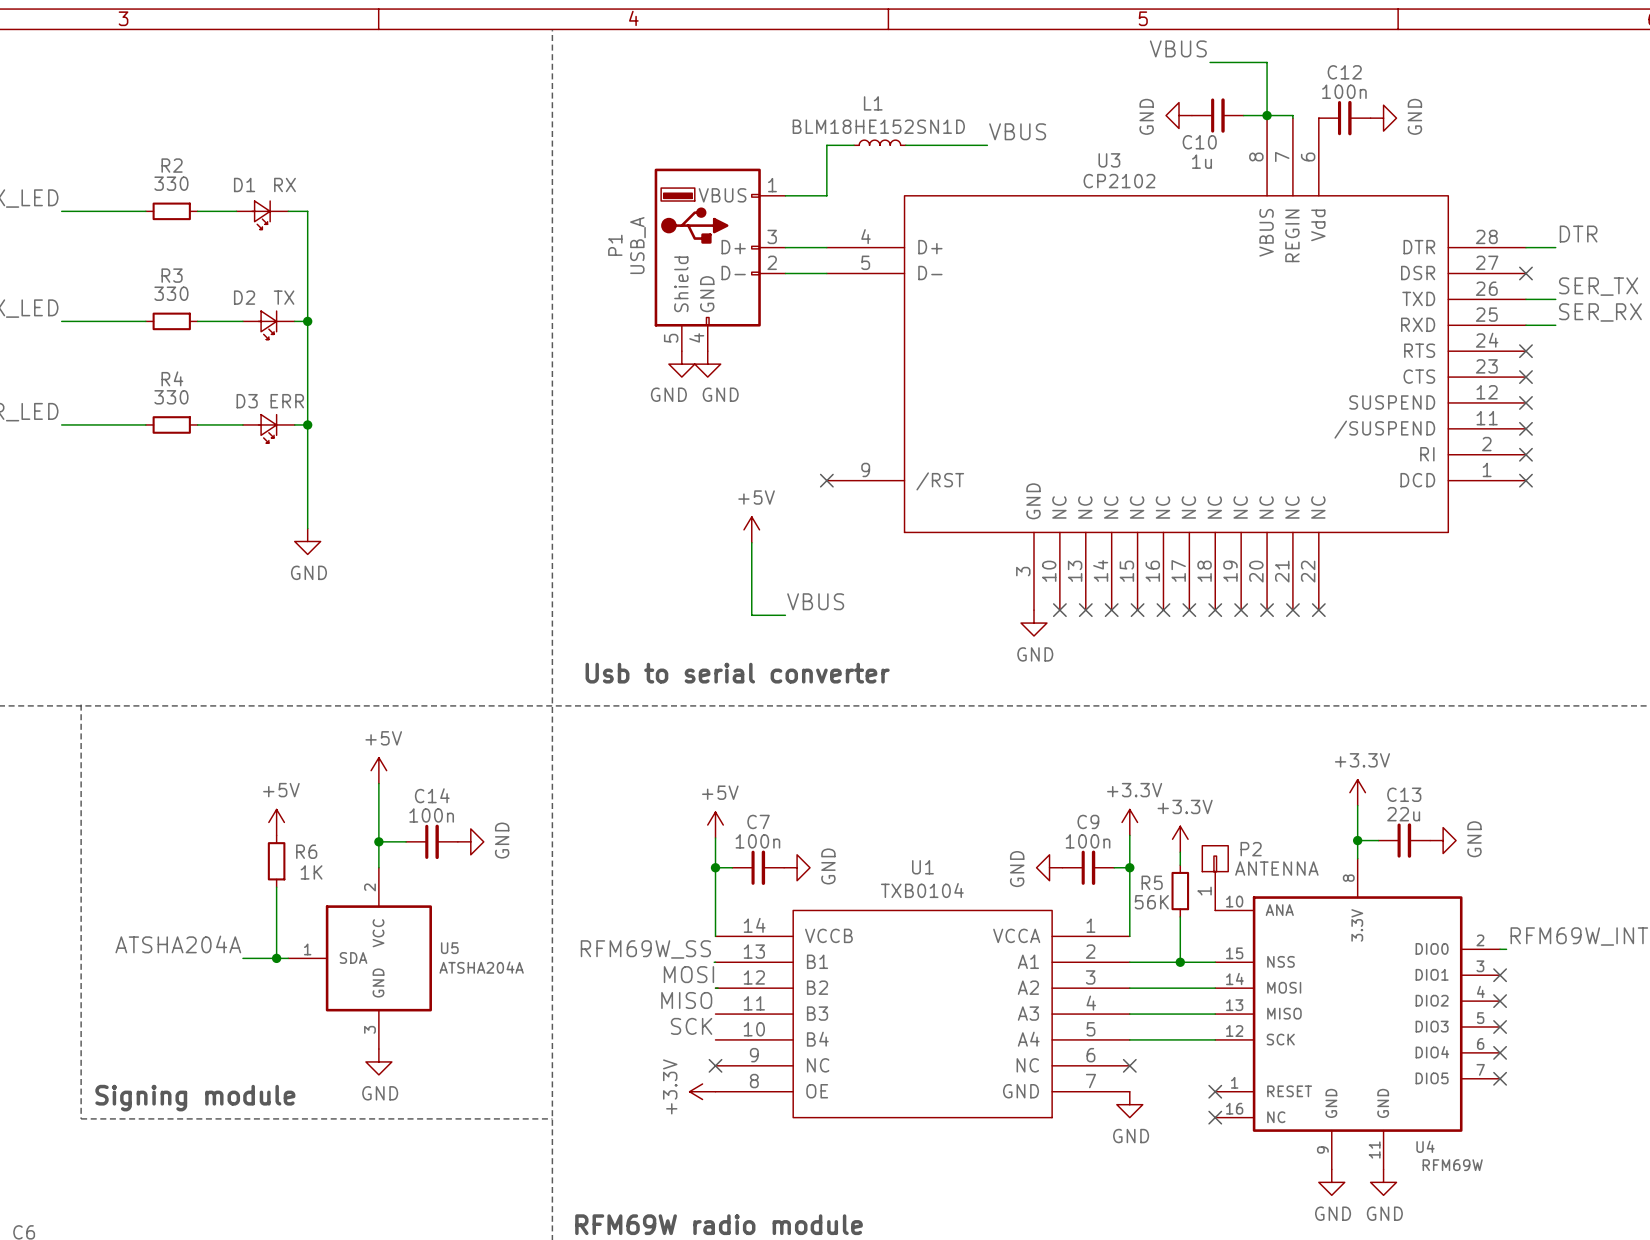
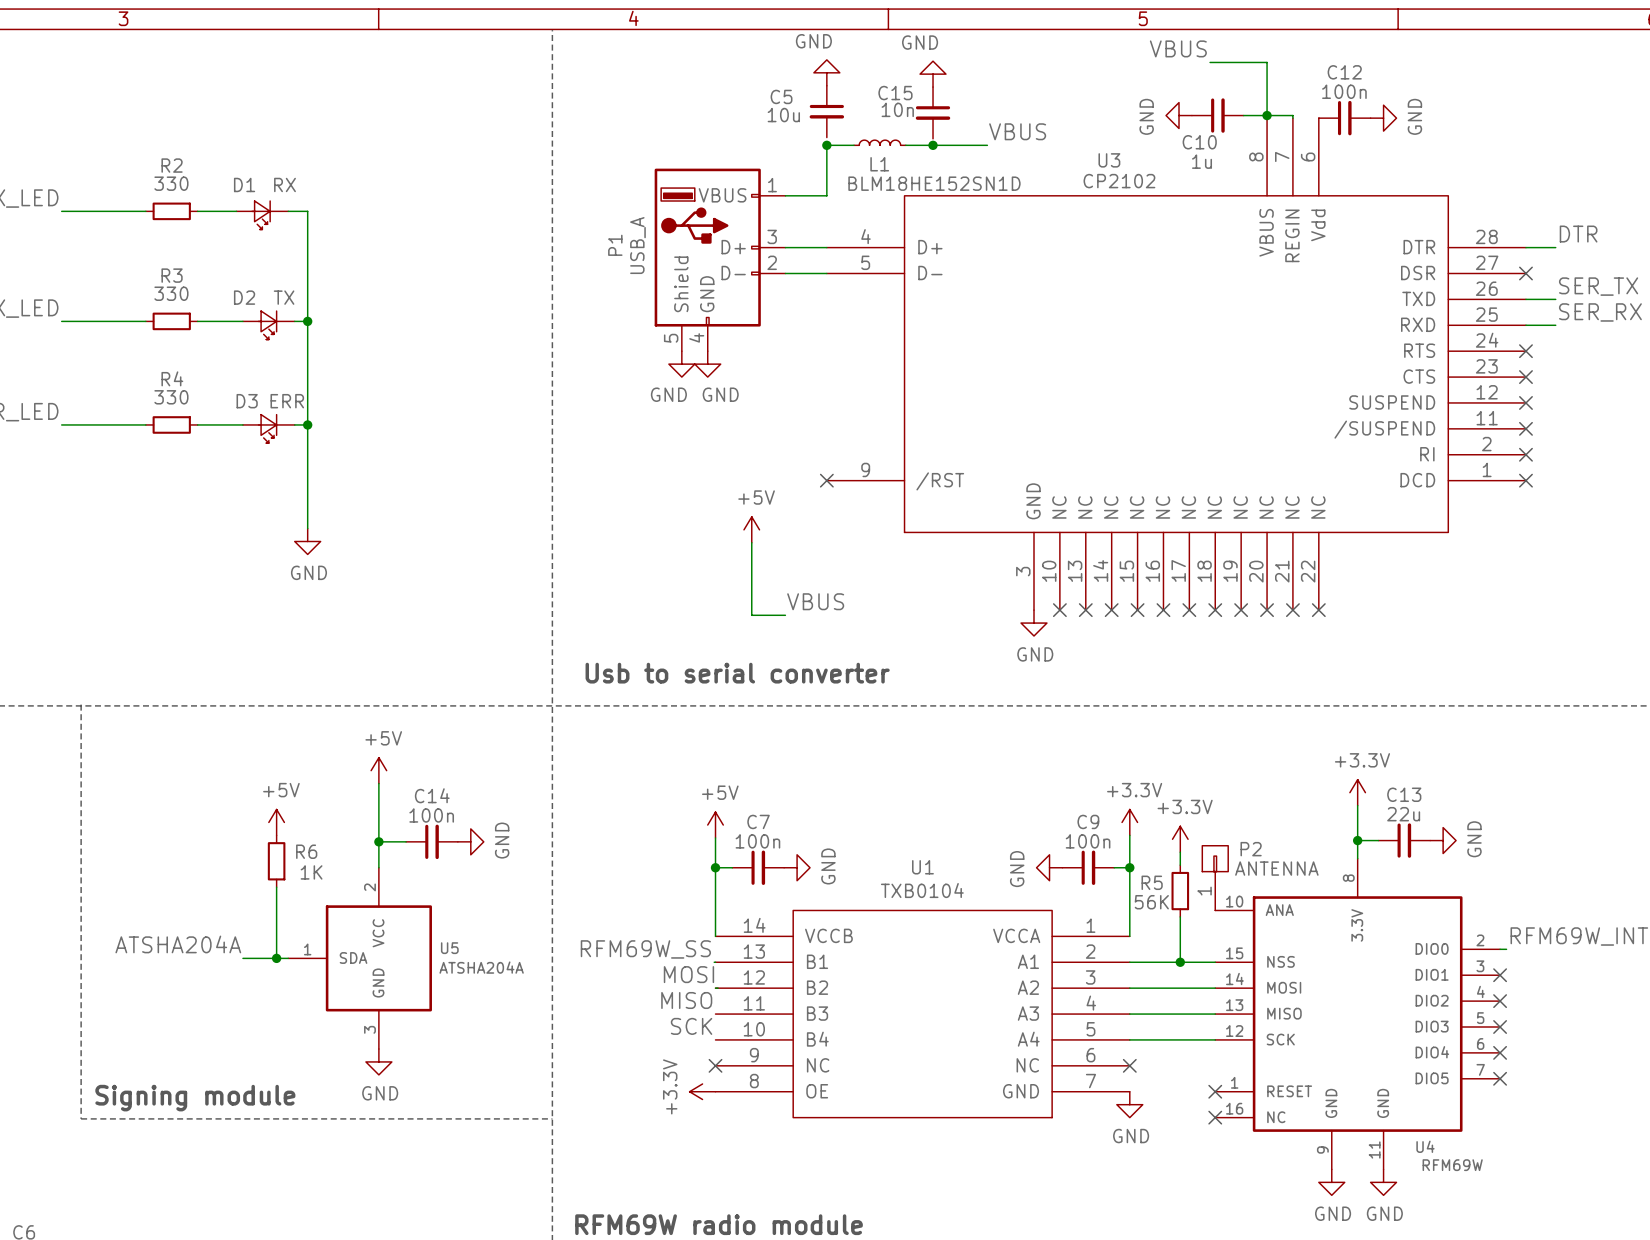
power symbol: none -> GND (826, 72)
power symbol: none -> GND (933, 74)
L1 name position: L1 (873, 103) -> L1 (879, 164)
C5: none -> 10u (826, 111)
C15: none -> 10n (933, 112)
L1 value position: BLM18HE152SN1D (878, 126) -> BLM18HE152SN1D (934, 183)
junction: none -> (826, 145)
junction: none -> (933, 145)

